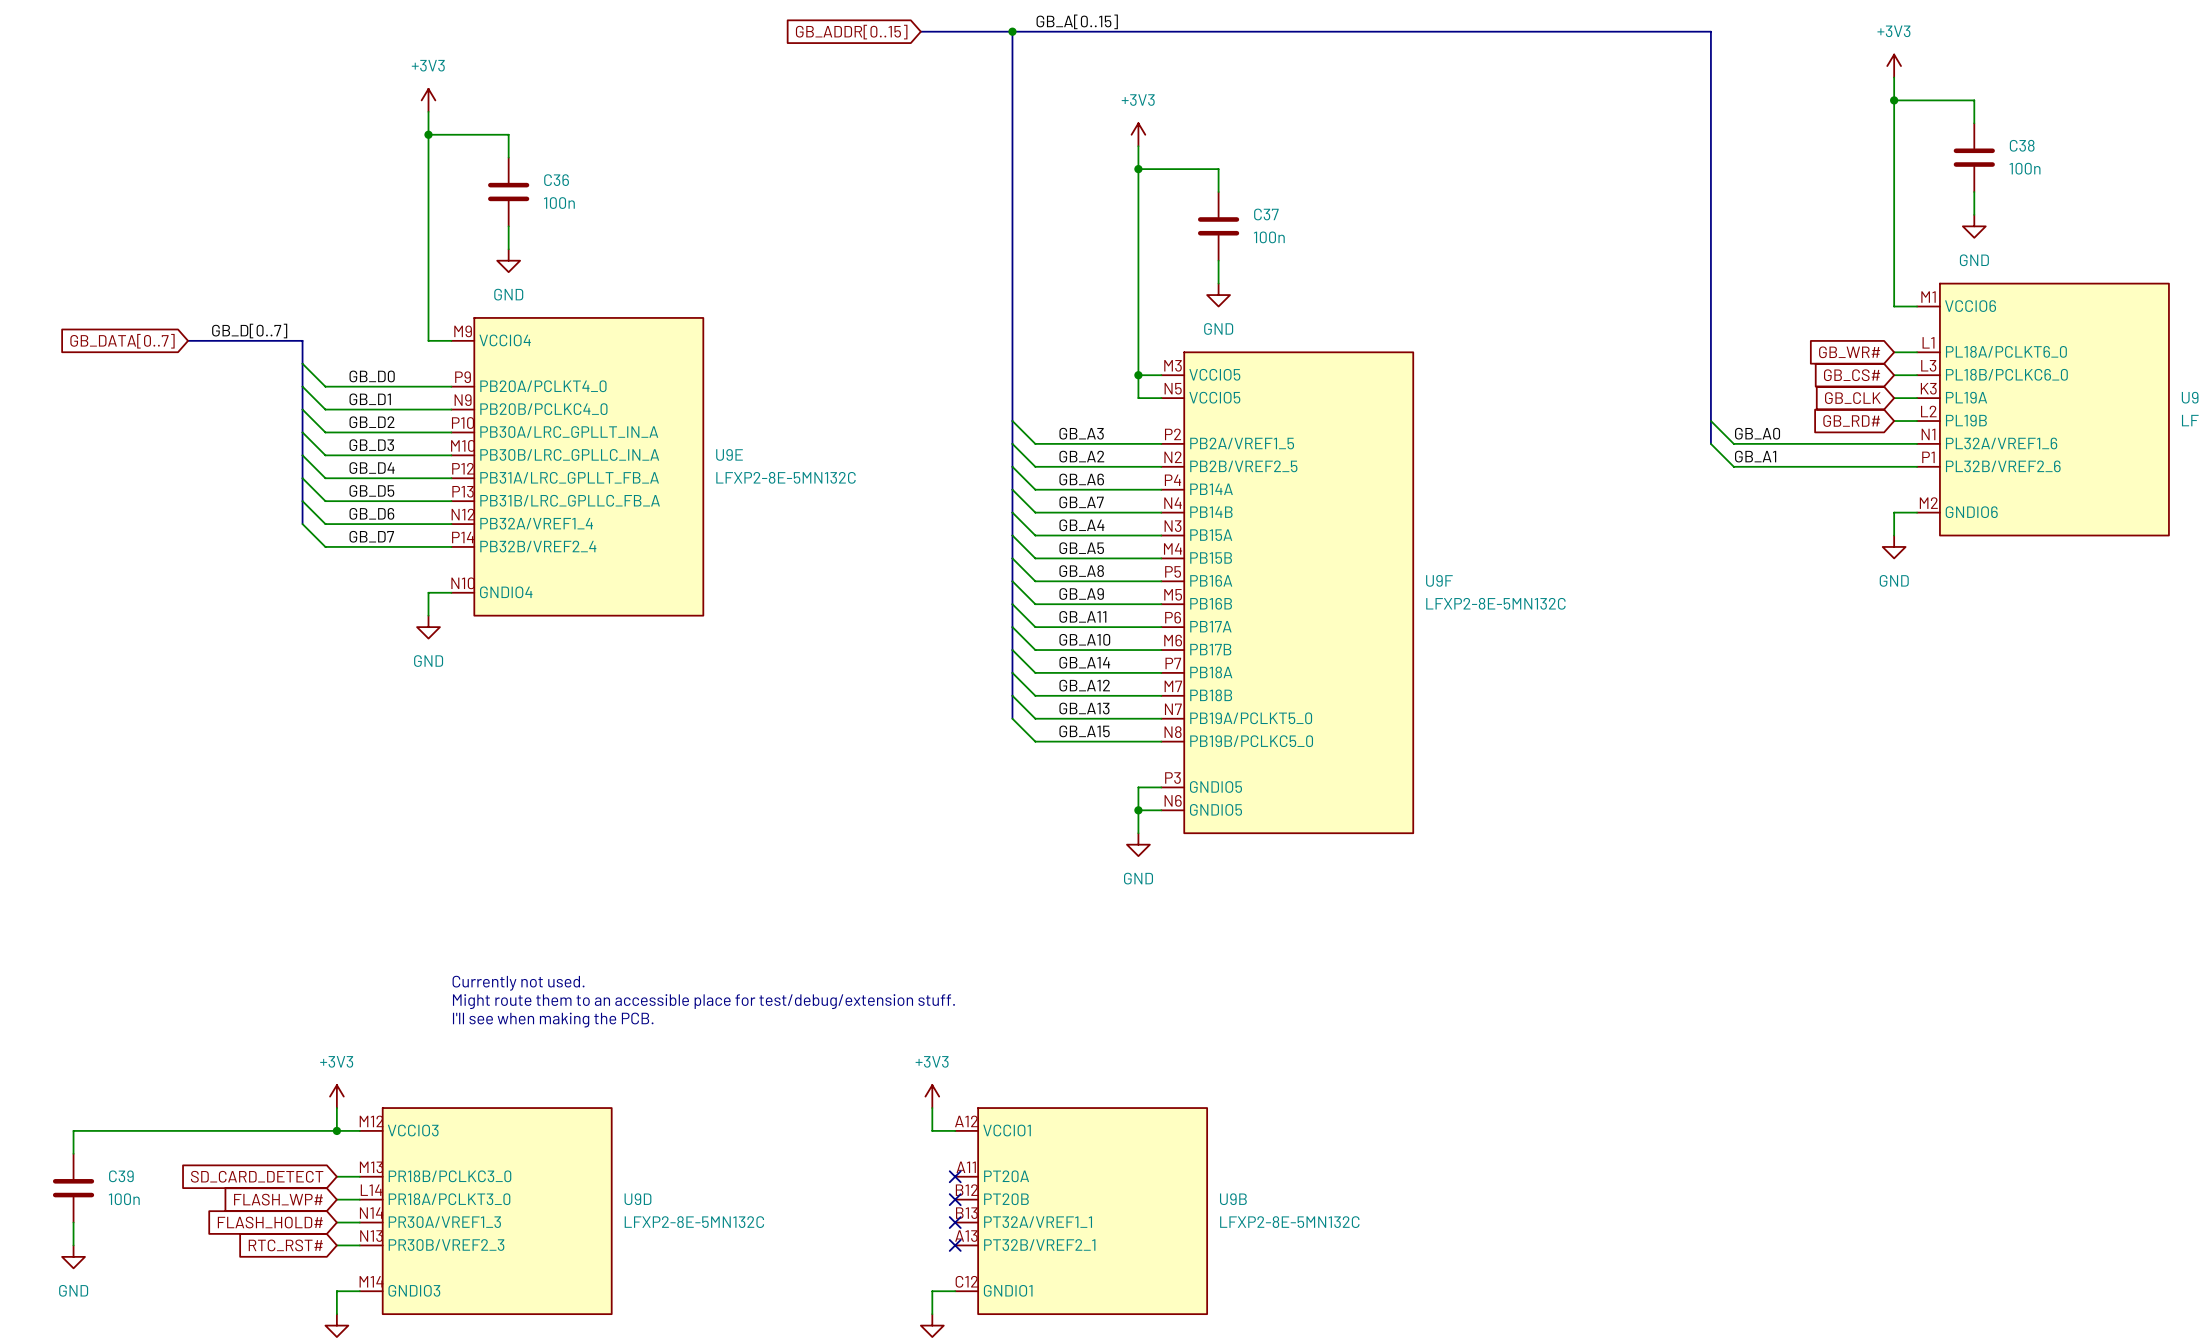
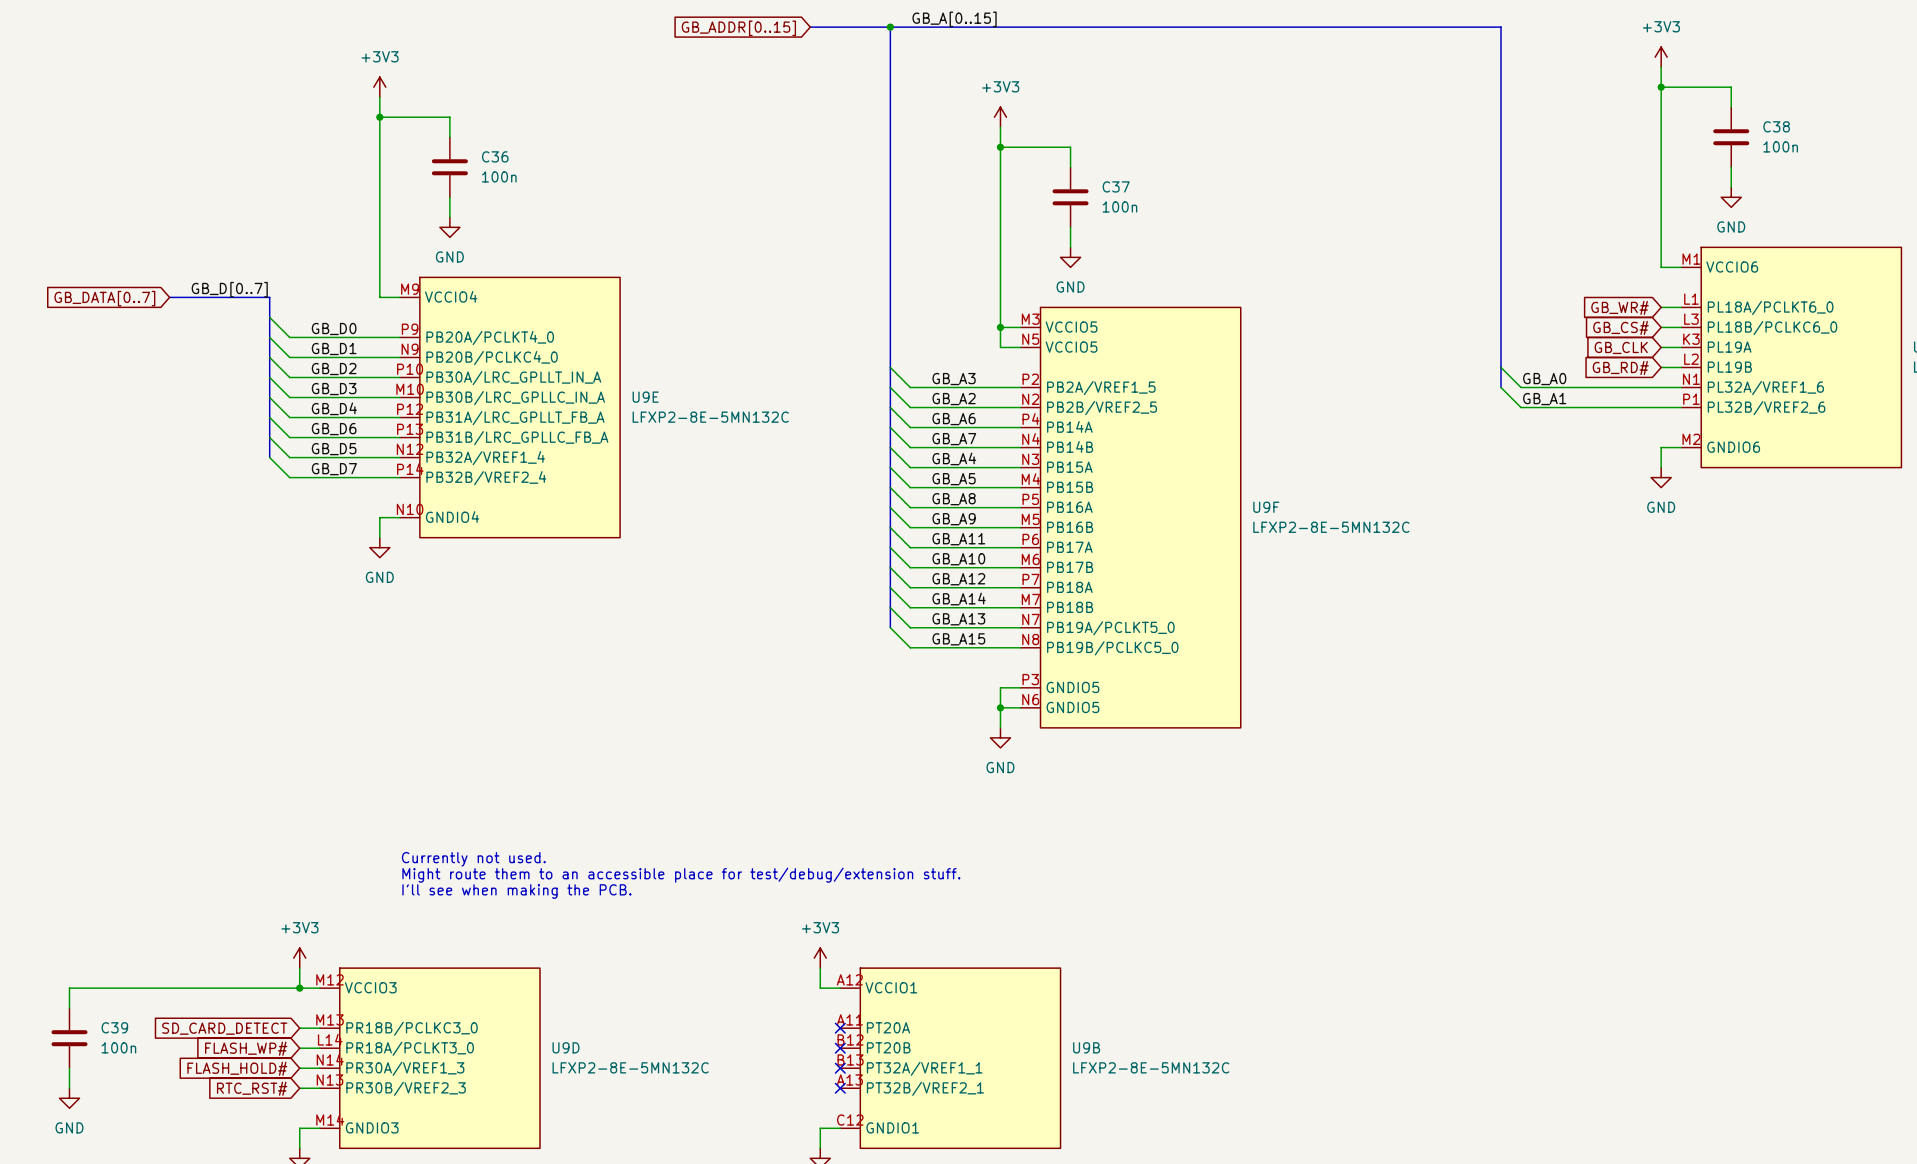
label: GB_D5 (371, 490) -> GB_D6 (334, 429)
label: GB_D6 (371, 513) -> GB_D5 (334, 449)
label: GB_A14 (1084, 662) -> GB_A12 (958, 579)
label: GB_A12 (1084, 685) -> GB_A14 (959, 599)

